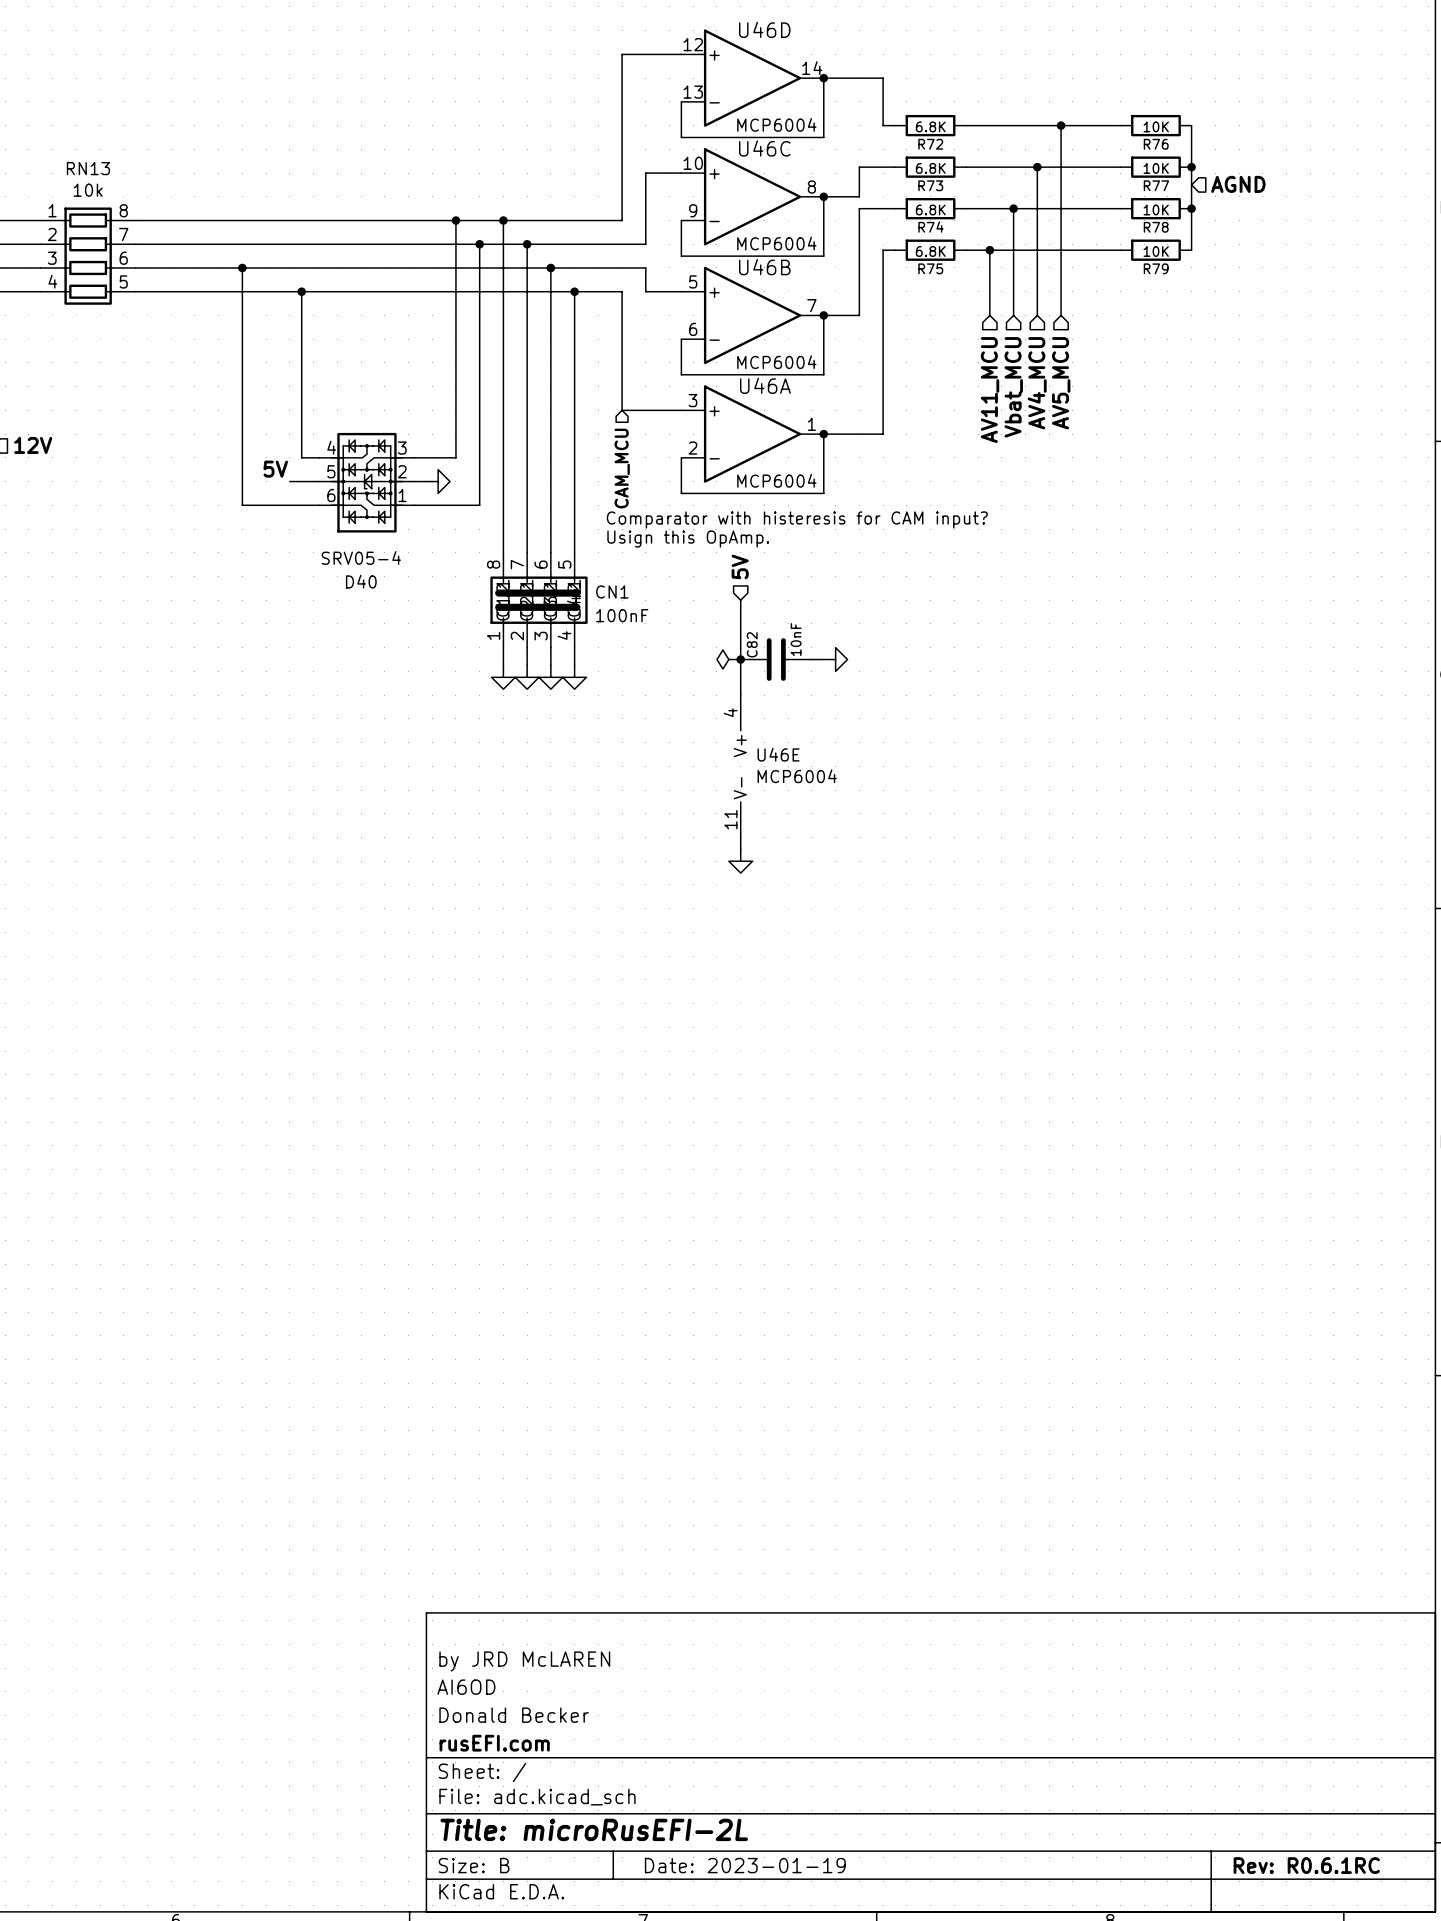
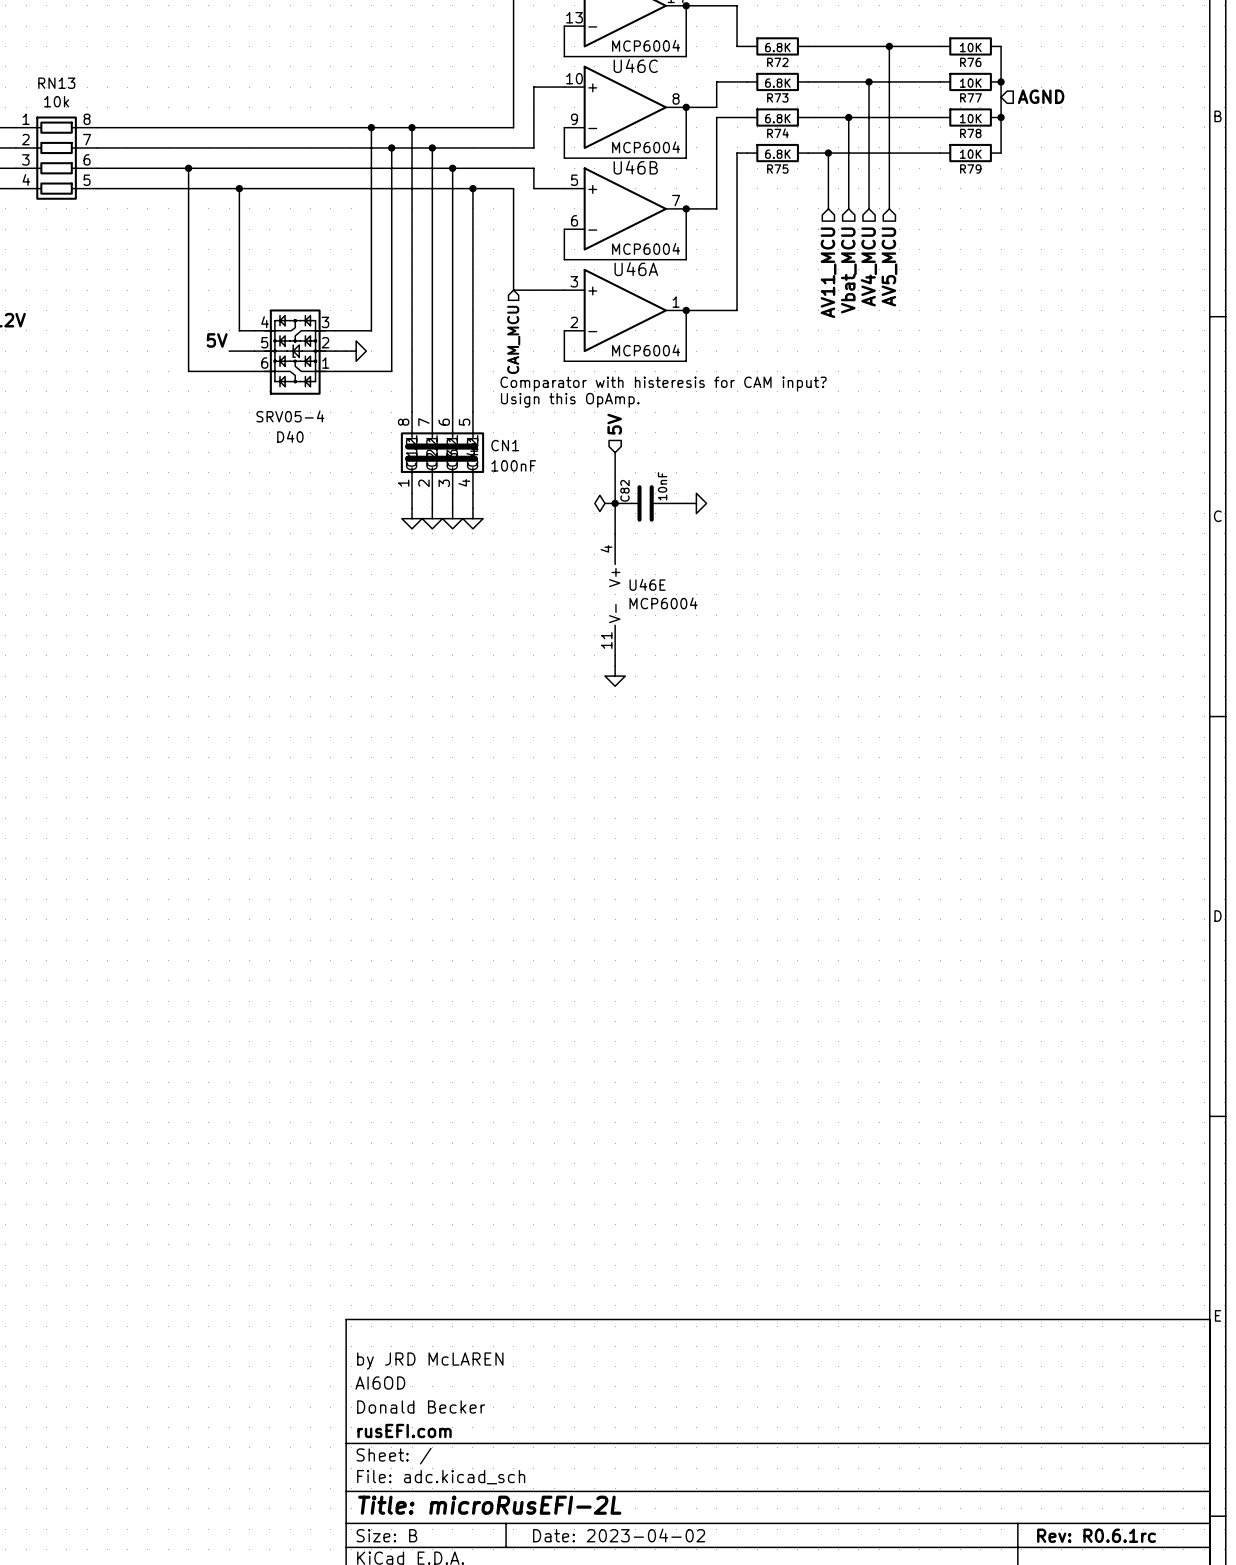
title block: Date: 2023-01-19 (745, 1865) -> Date: 2023-04-02 (619, 1535)
title block: Rev: R0.6.1RC (1306, 1865) -> Rev: R0.6.1rc (1096, 1535)

